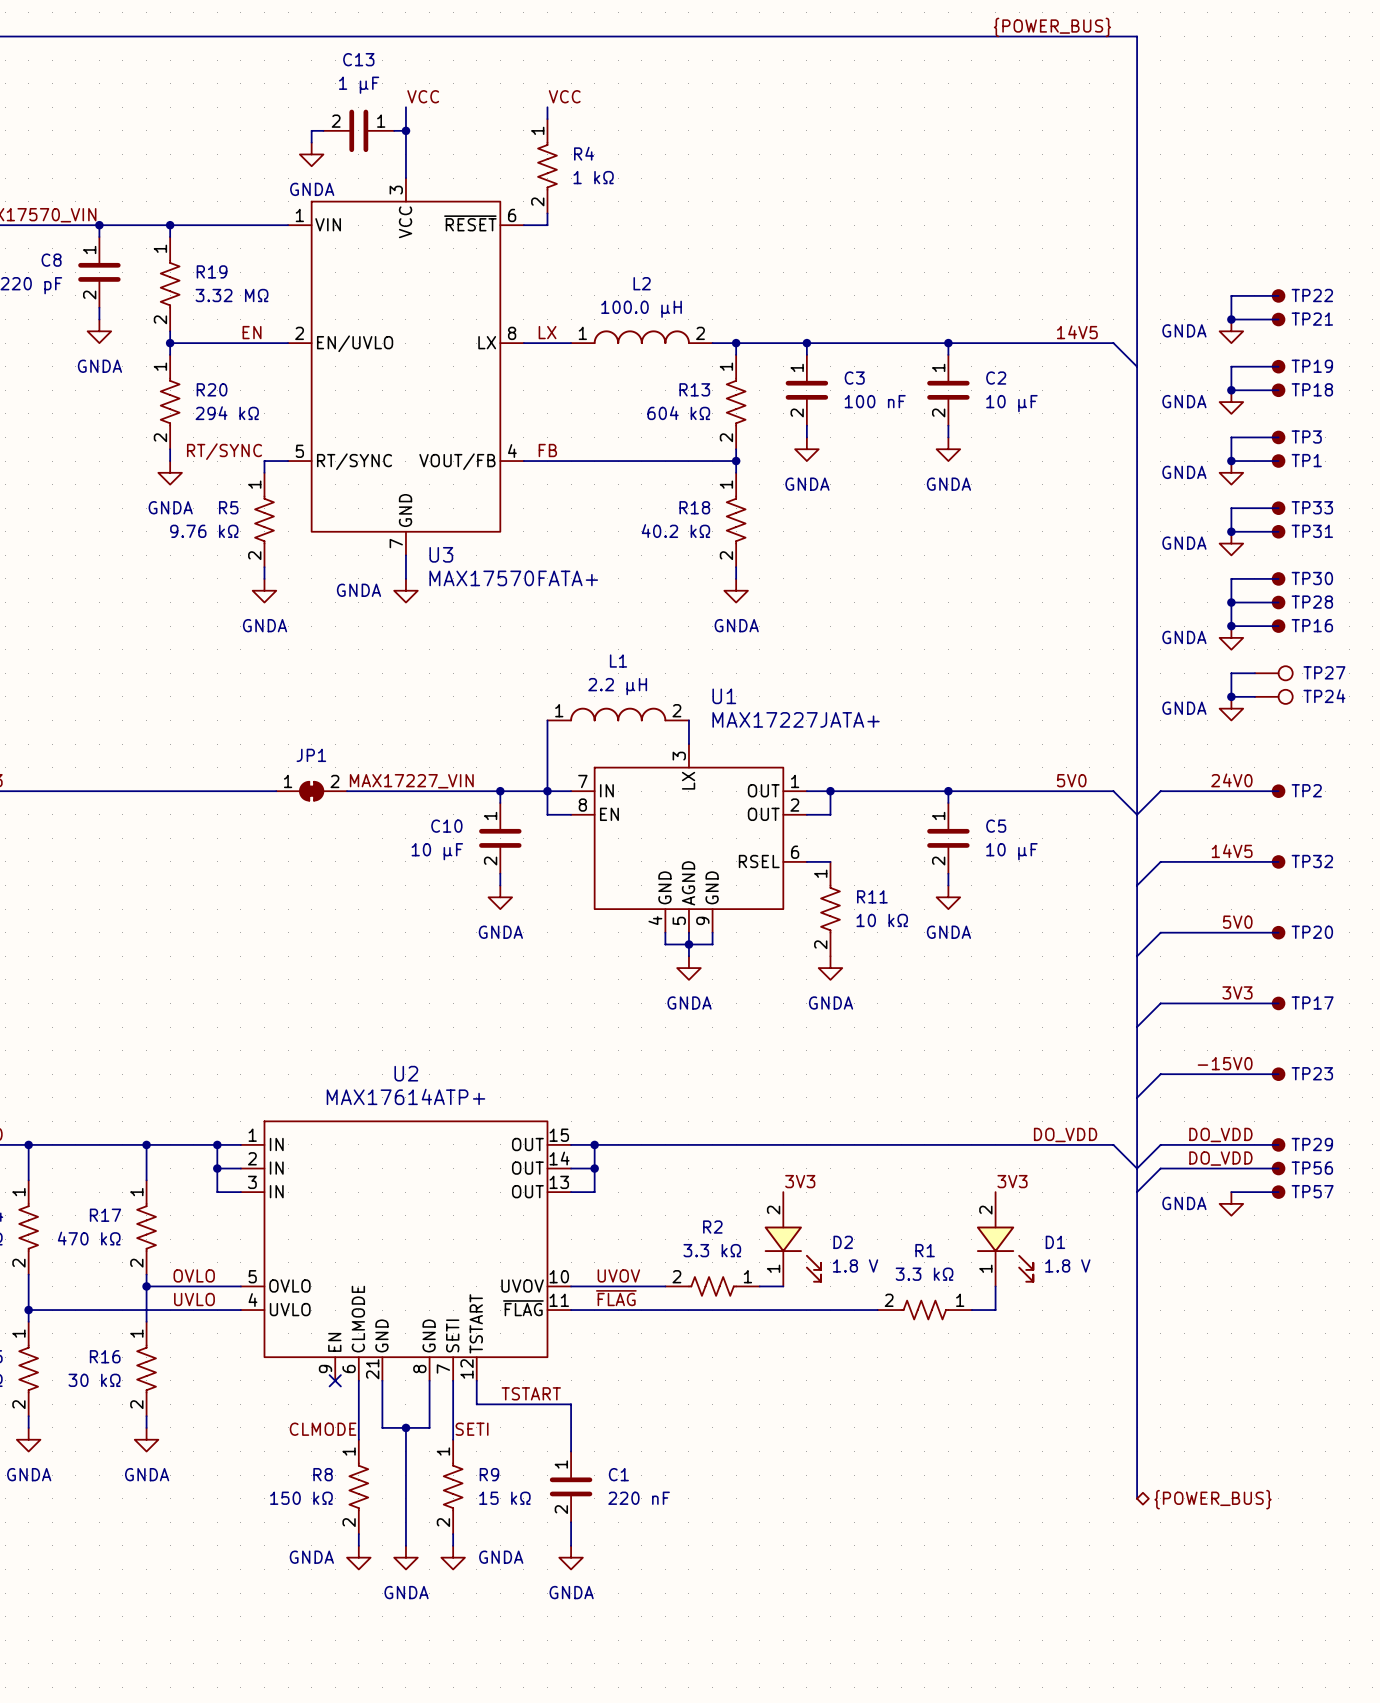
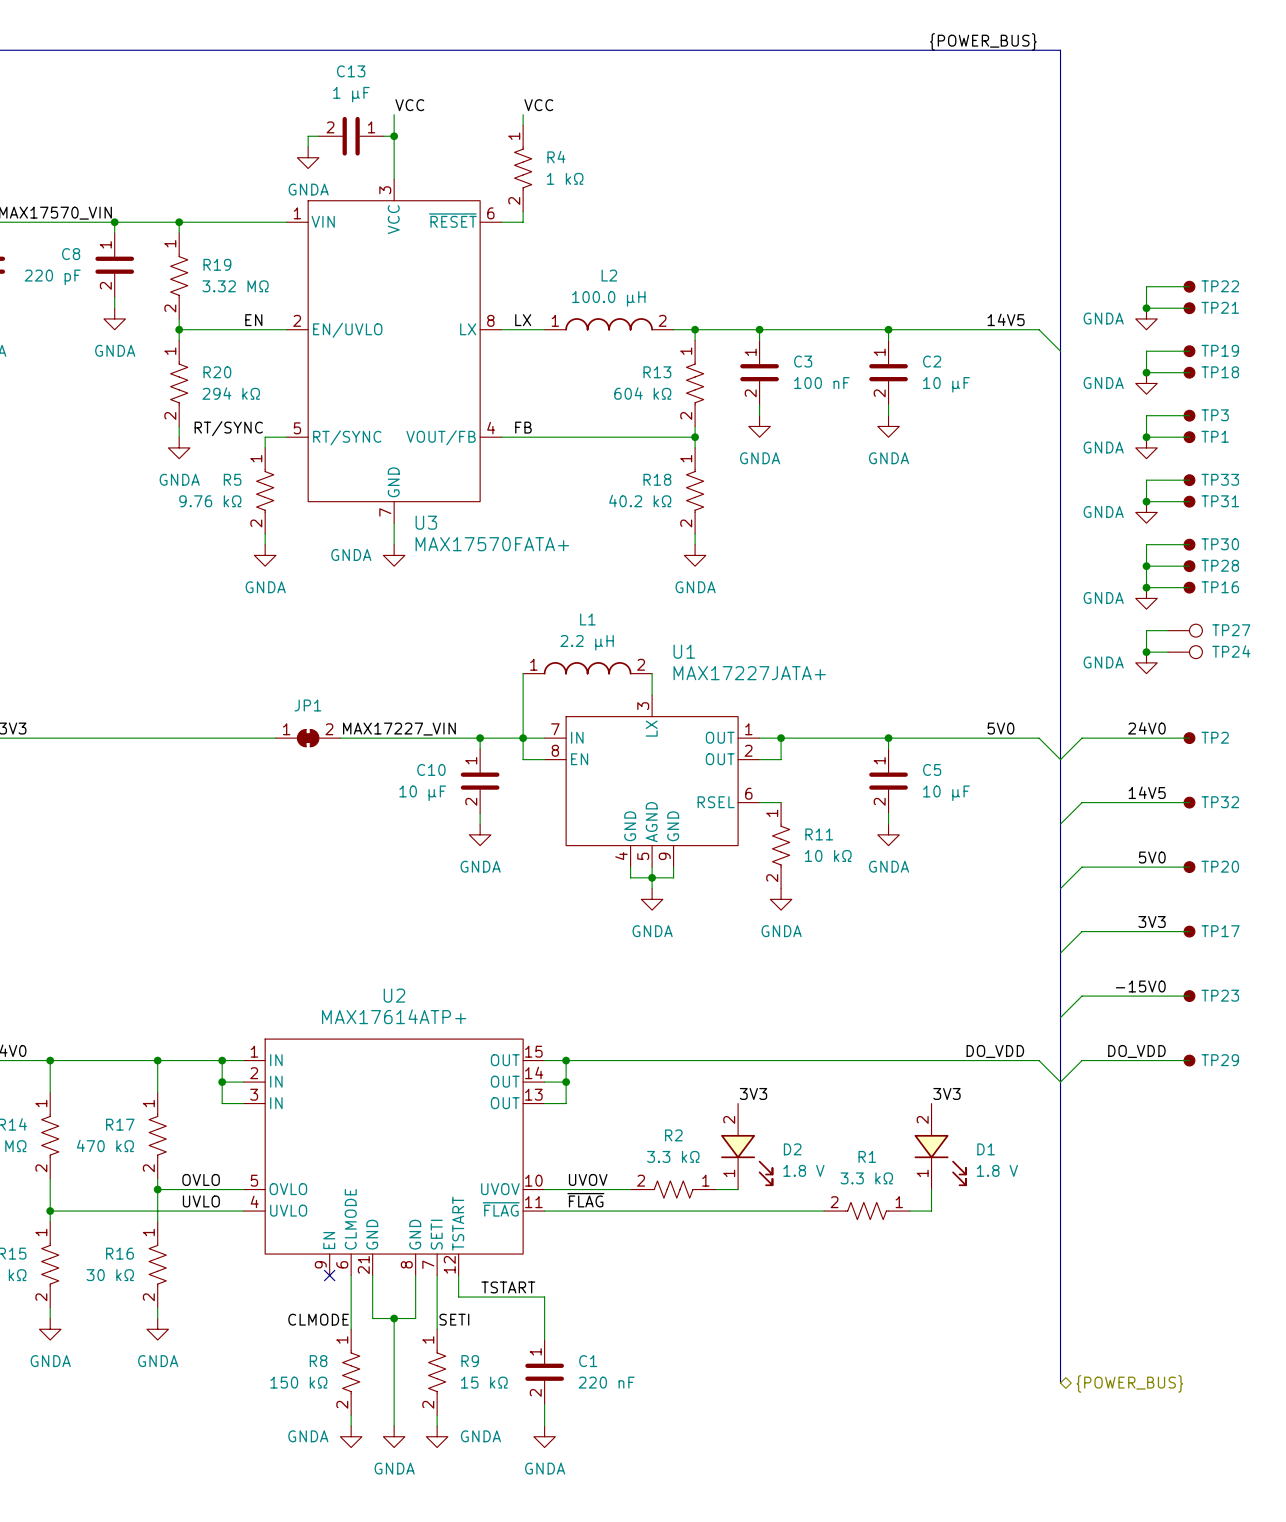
label: DO_VDD (1220, 1158) -> none
wire: (1278, 1168) (1160, 1168) (1137, 1192) -> none
TP56: (1278, 1168) -> none
wire: (1231, 1192) (1278, 1192) -> none
TP57: (1278, 1192) -> none
power symbol: GNDA (1231, 1203) -> none

